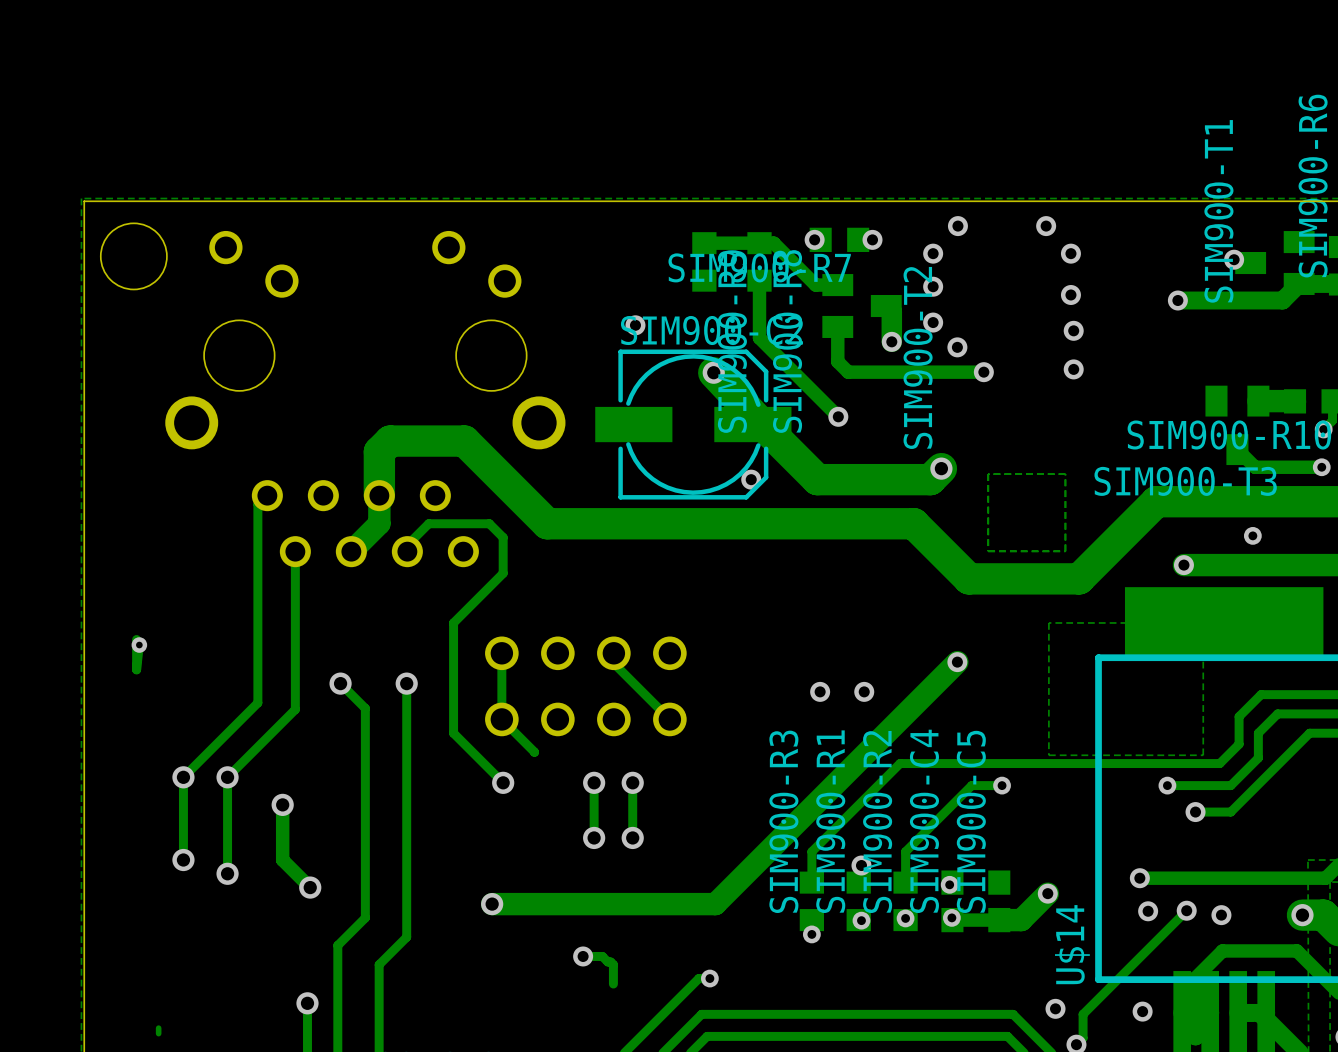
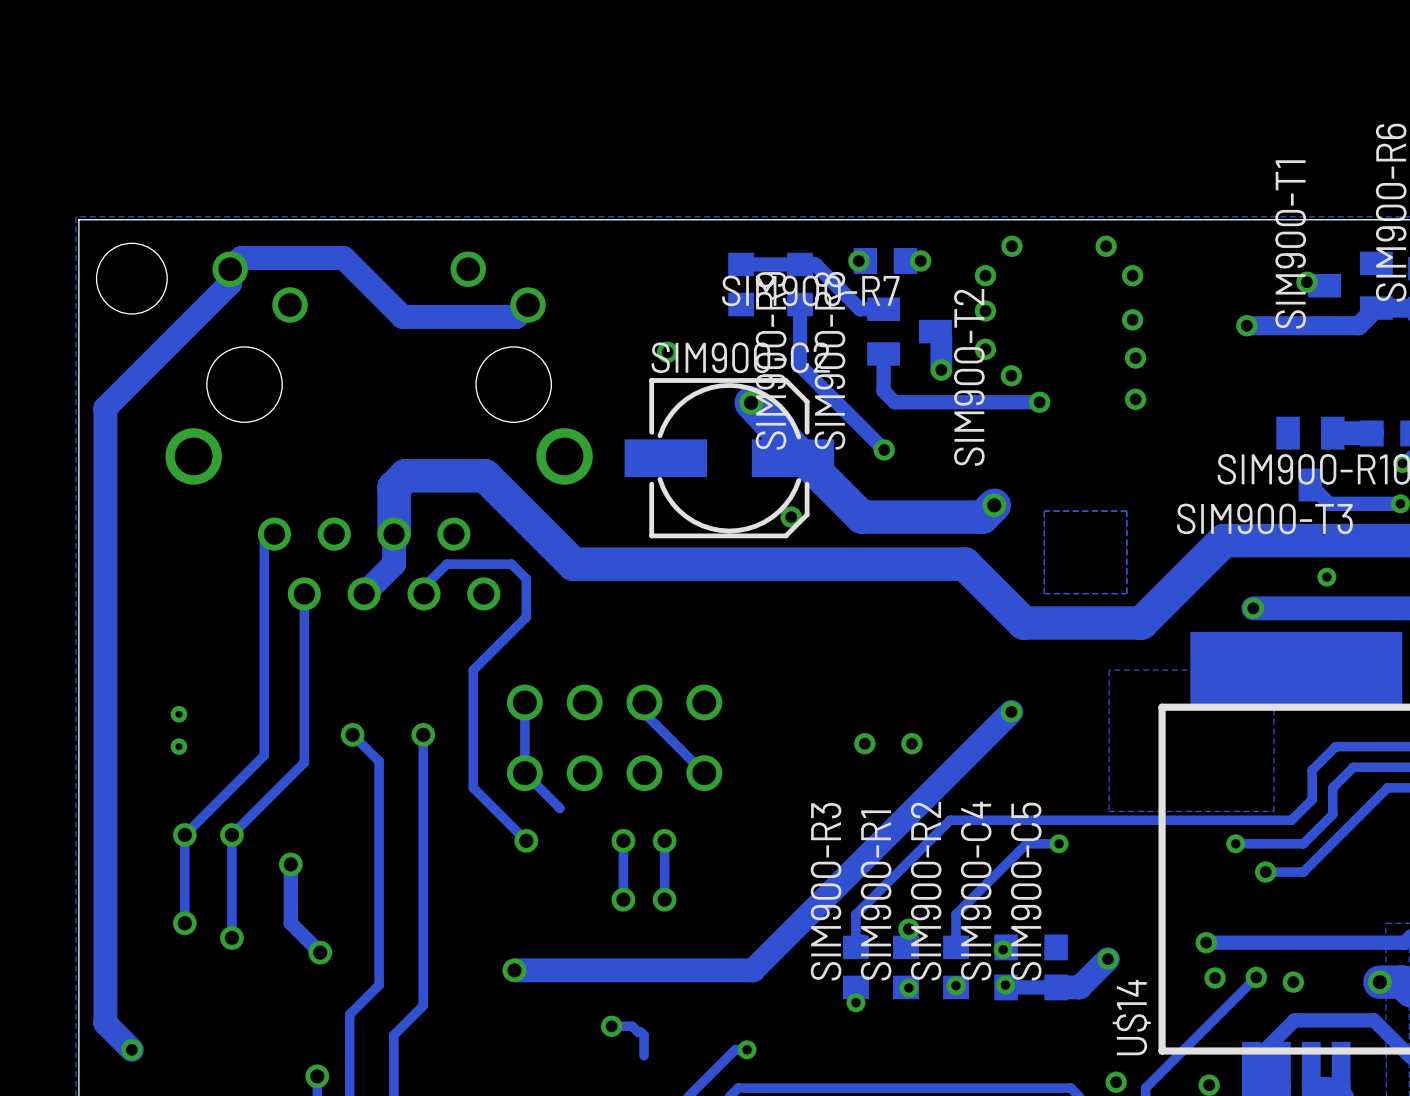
track: none -> (528, 305) (516, 316) (402, 316) (343, 258) (241, 258) (230, 269) (230, 283) (105, 408) (105, 1023) (131, 1049)
track: (136, 639) (136, 669) (139, 645) -> none
via: (139, 645) -> none
via: none -> (178, 714)
via: none -> (178, 746)
via: none -> (131, 1049)

